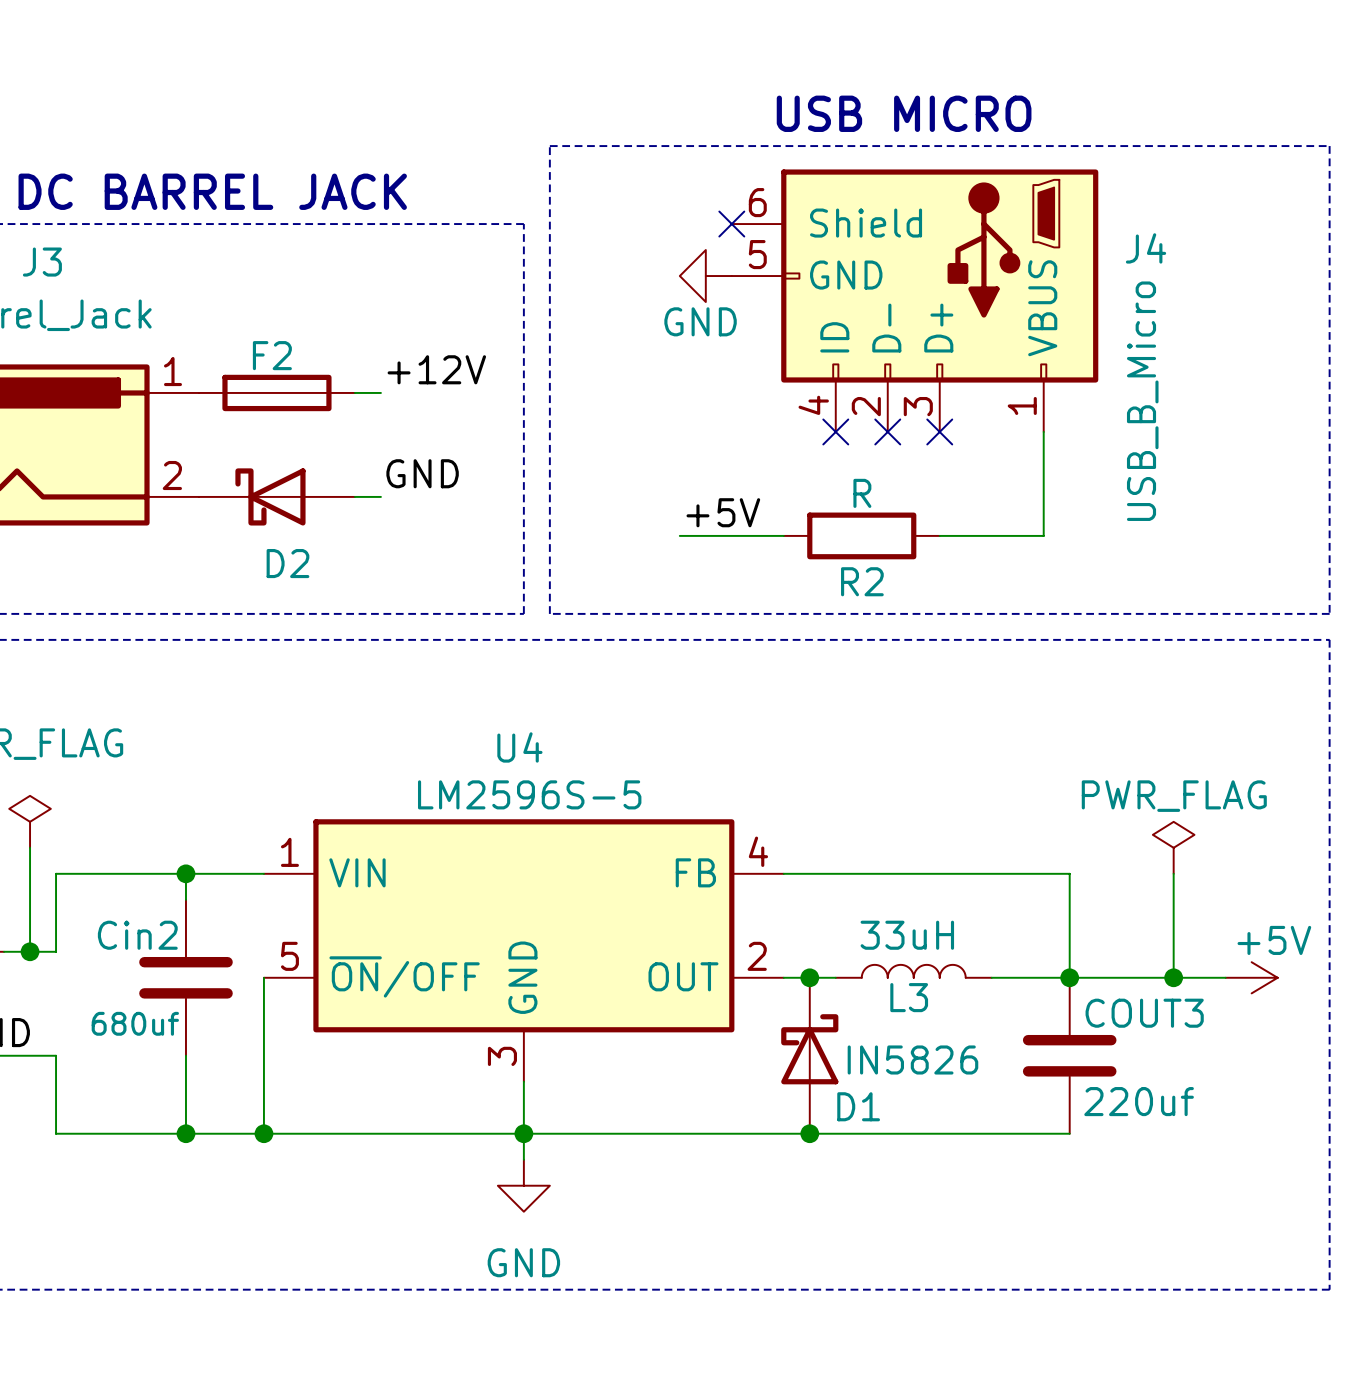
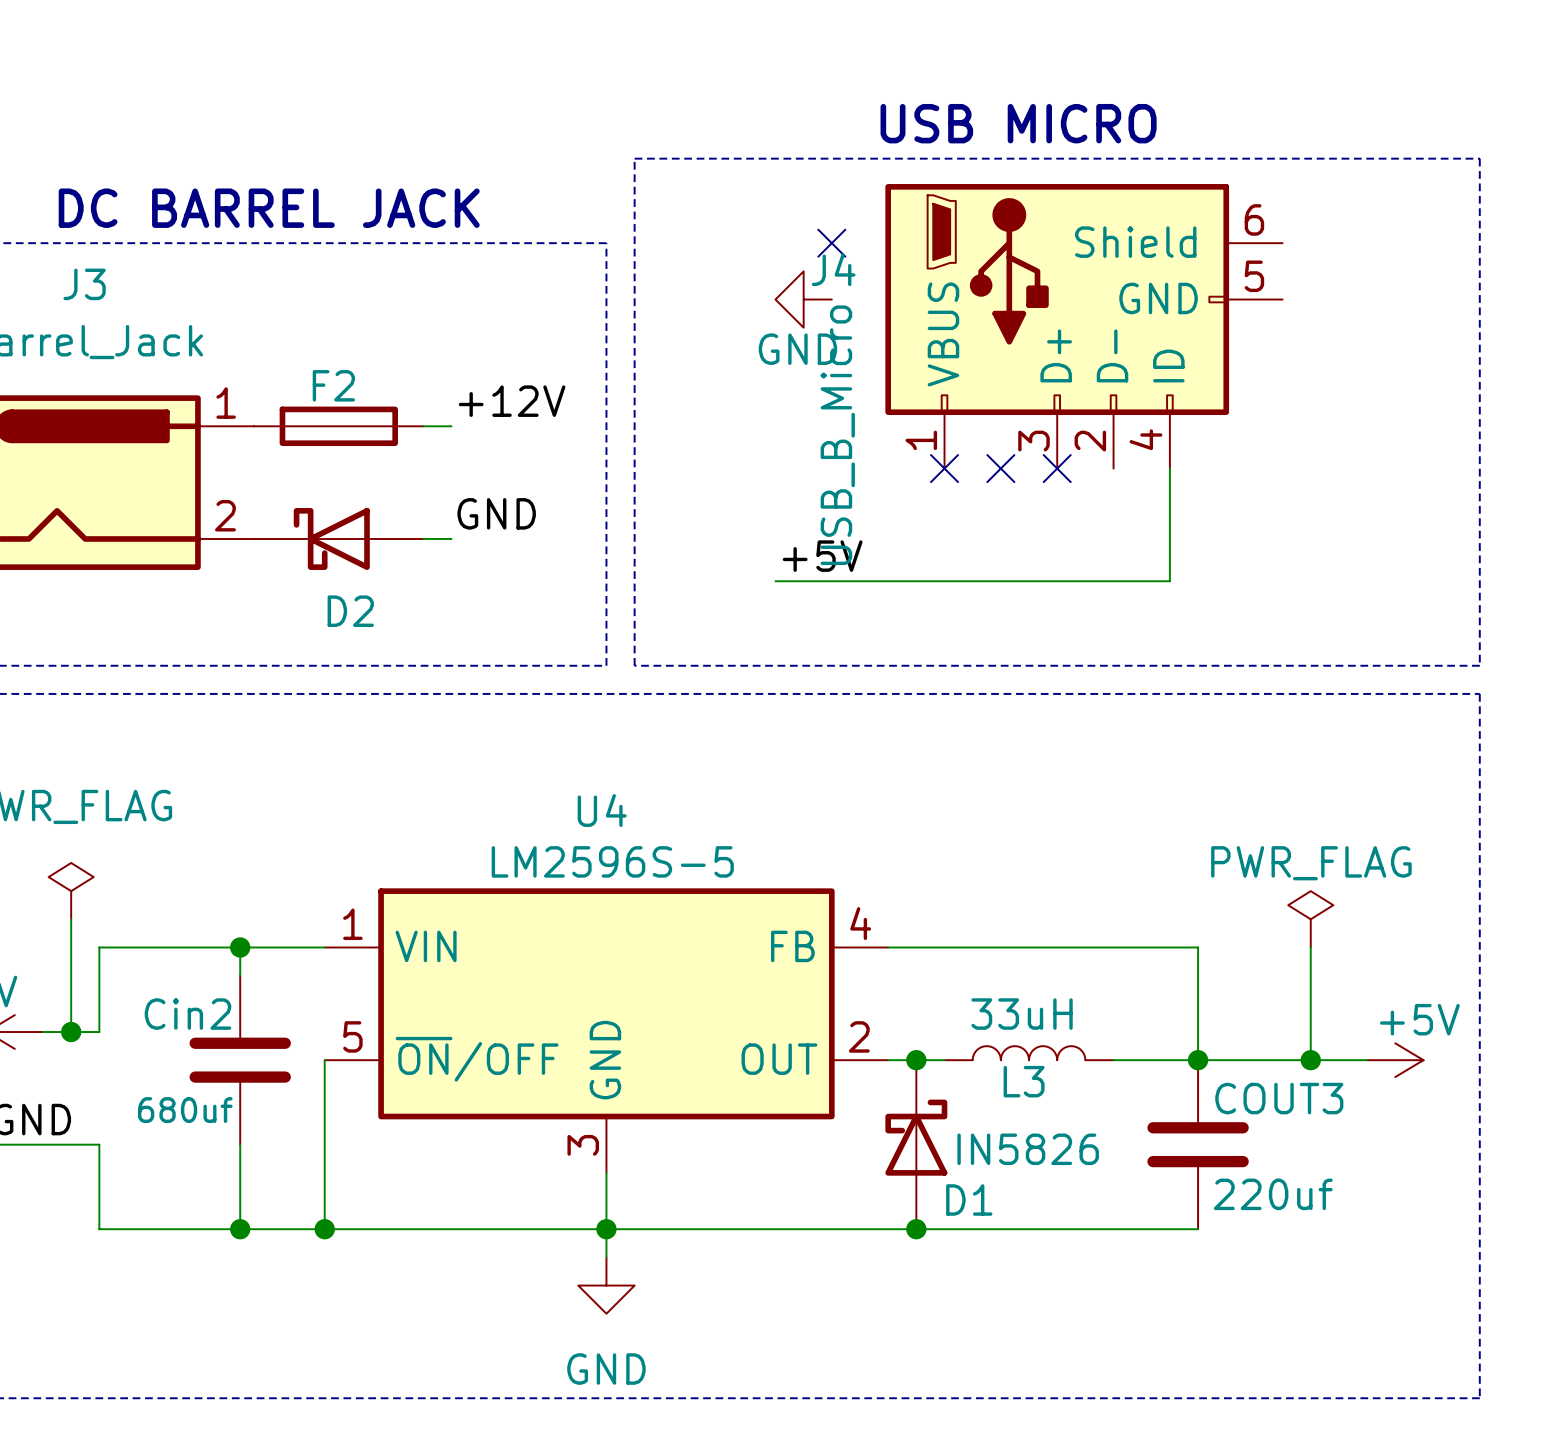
J4 flip: as is (939, 276) -> left-right (1057, 299)
wire: none -> (888, 581) (1057, 581)
R2: R (861, 535) -> none

